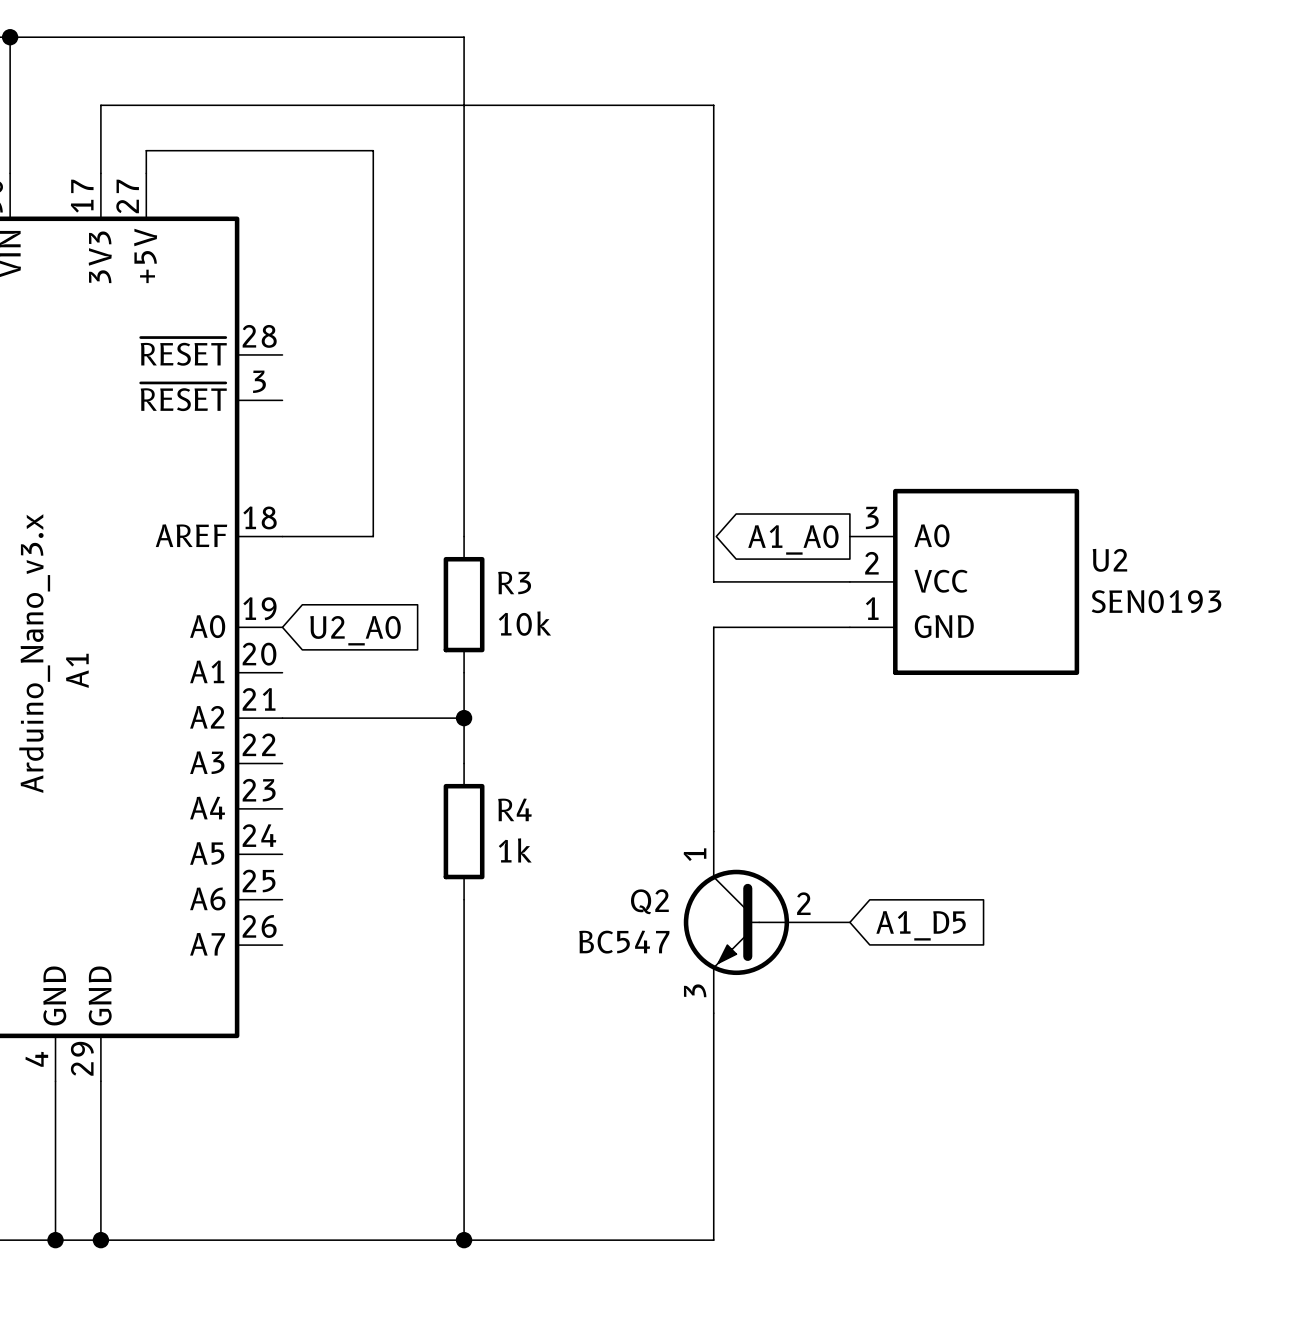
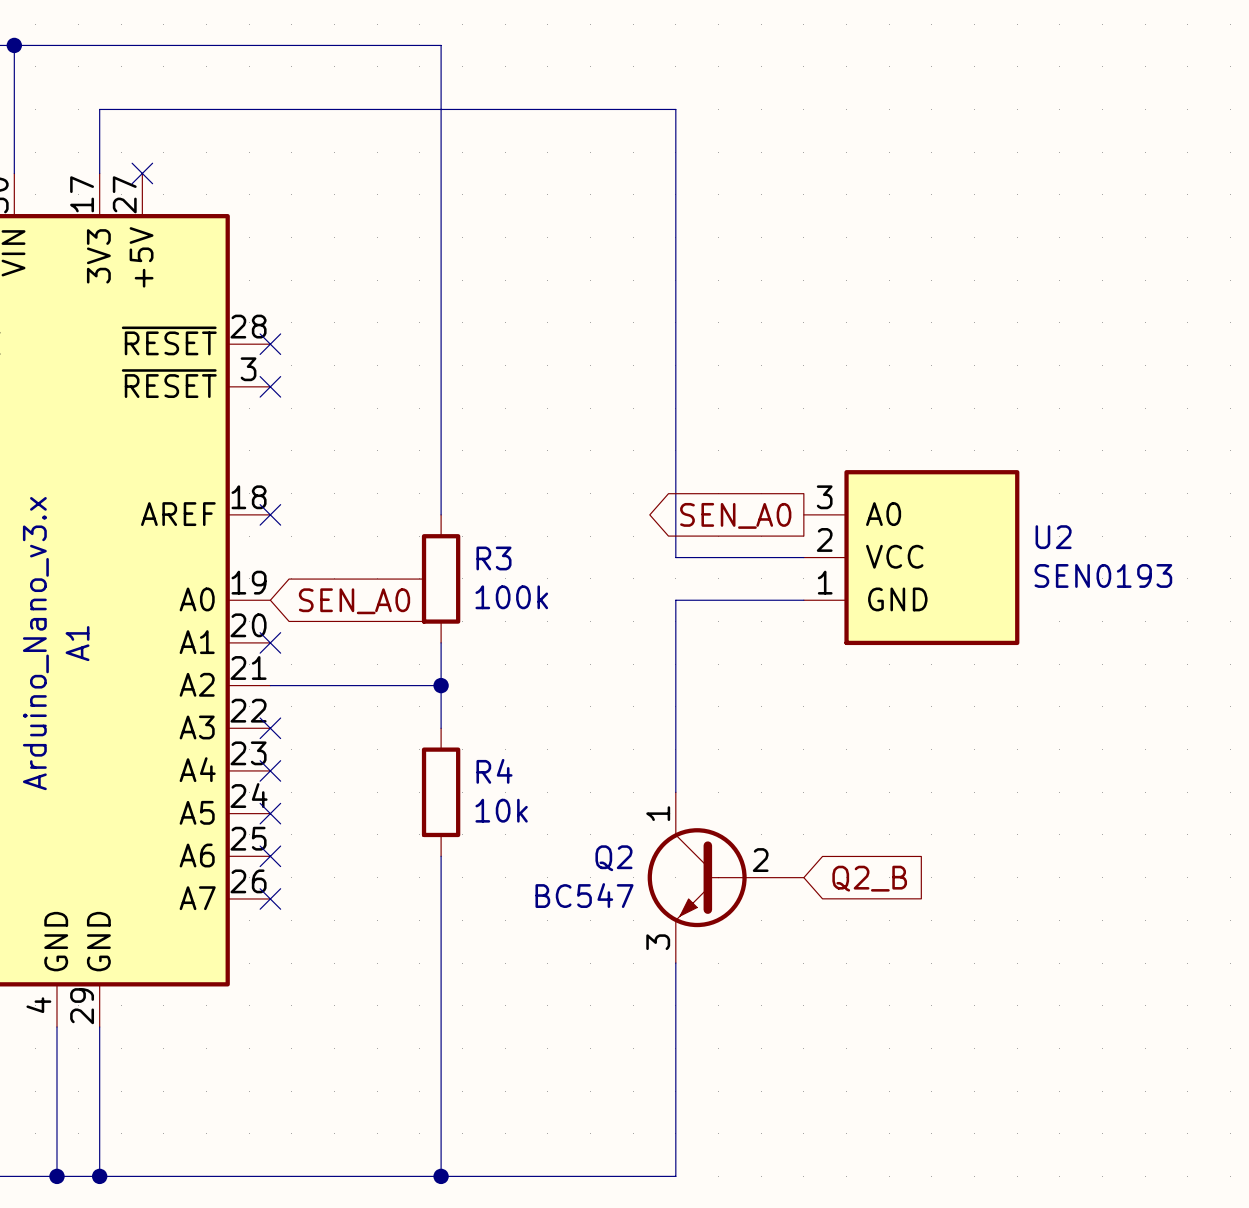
wire: (146, 173) (146, 150) (373, 150) (373, 536) (282, 536) -> none
no-connect mark: none -> (142, 173)
no-connect mark: none -> (270, 344)
no-connect mark: none -> (270, 386)
no-connect mark: none -> (270, 514)
global label: A1_A0 (793, 539) -> SEN_A0 (735, 515)
R3 value: 10k (524, 623) -> 100k (511, 597)
global label: U2_A0 (355, 630) -> SEN_A0 (354, 601)
no-connect mark: none -> (270, 642)
no-connect mark: none -> (270, 728)
no-connect mark: none -> (270, 770)
R4 value: 1k (515, 850) -> 10k (501, 810)
no-connect mark: none -> (270, 813)
no-connect mark: none -> (270, 856)
global label: A1_D5 (921, 925) -> Q2_B (869, 878)
no-connect mark: none -> (270, 898)

